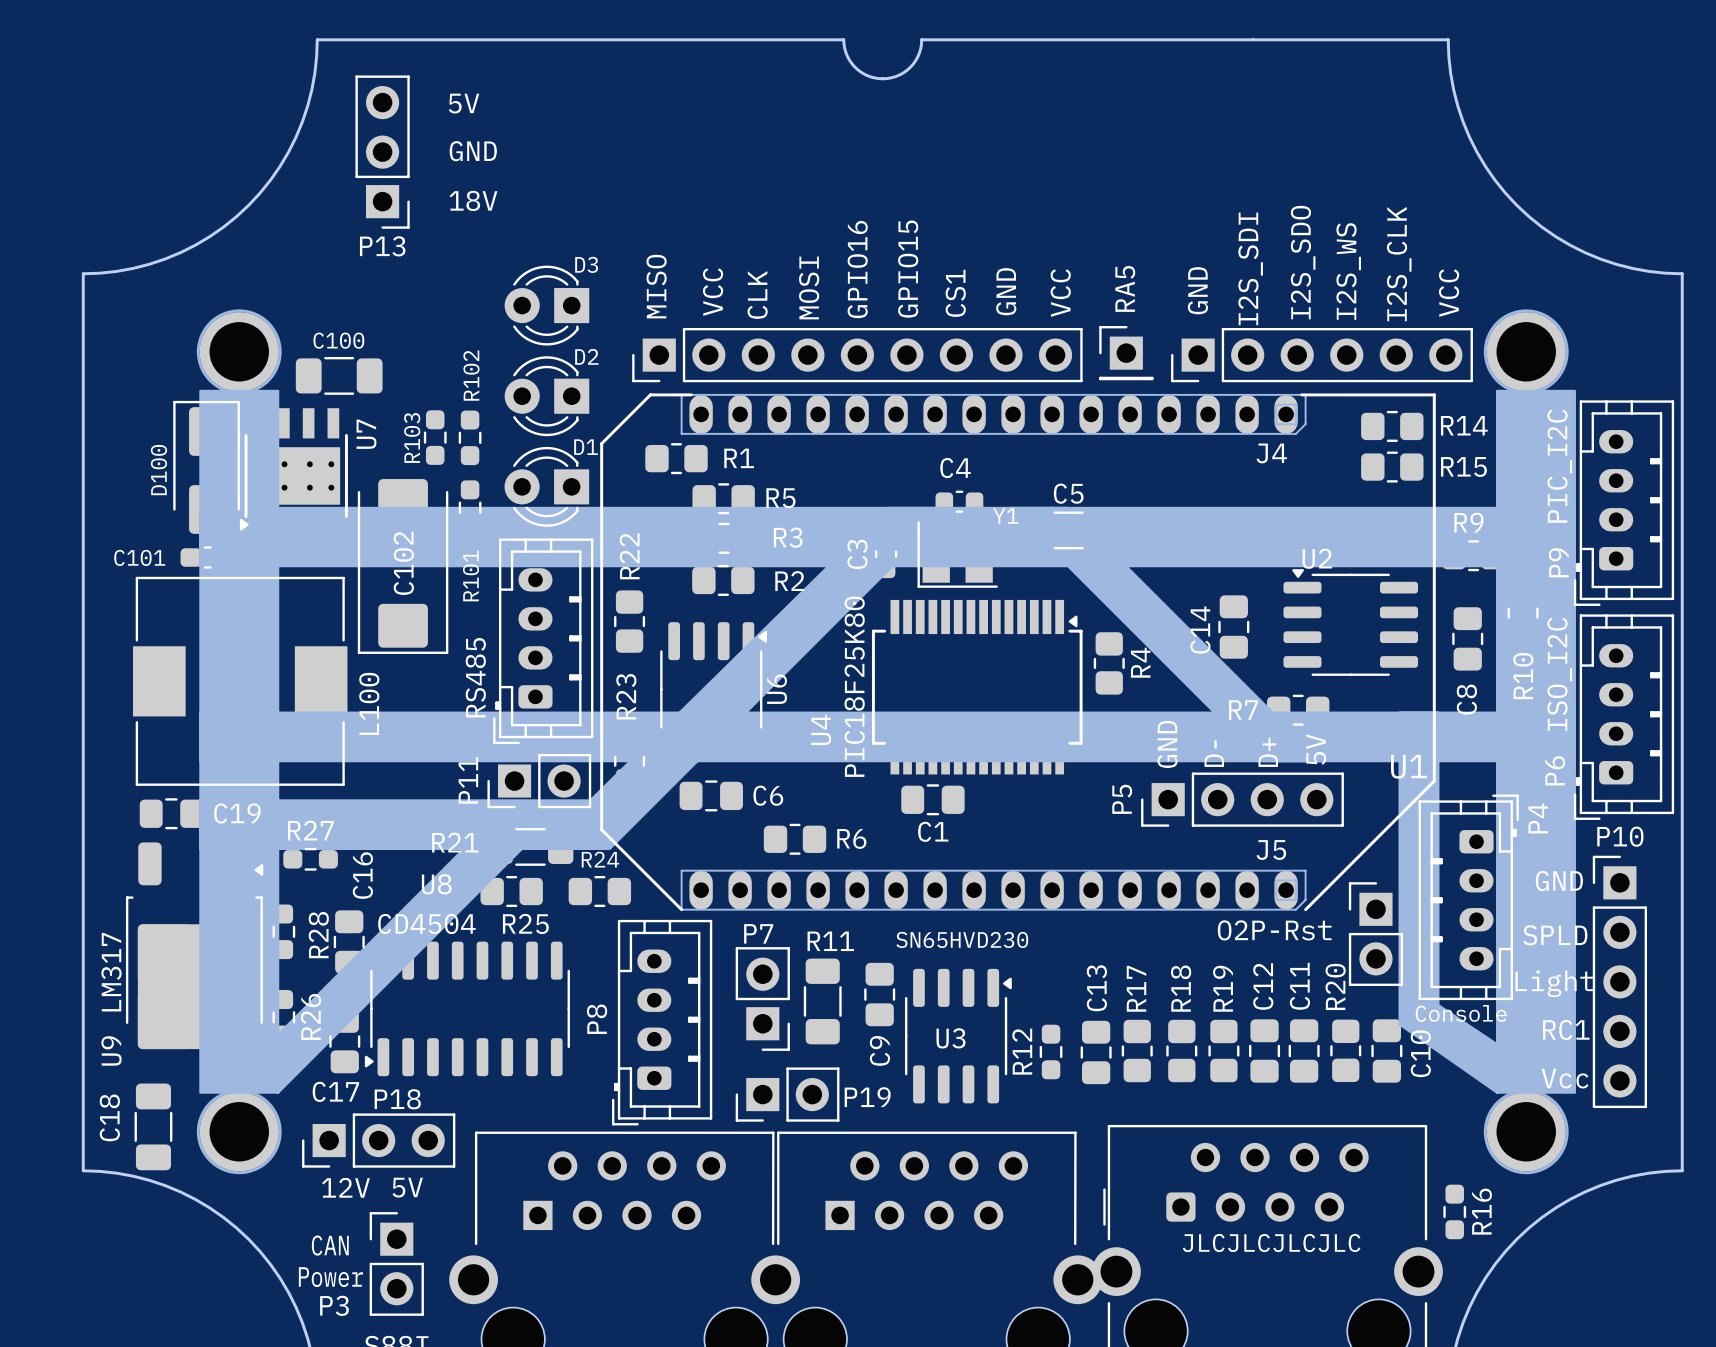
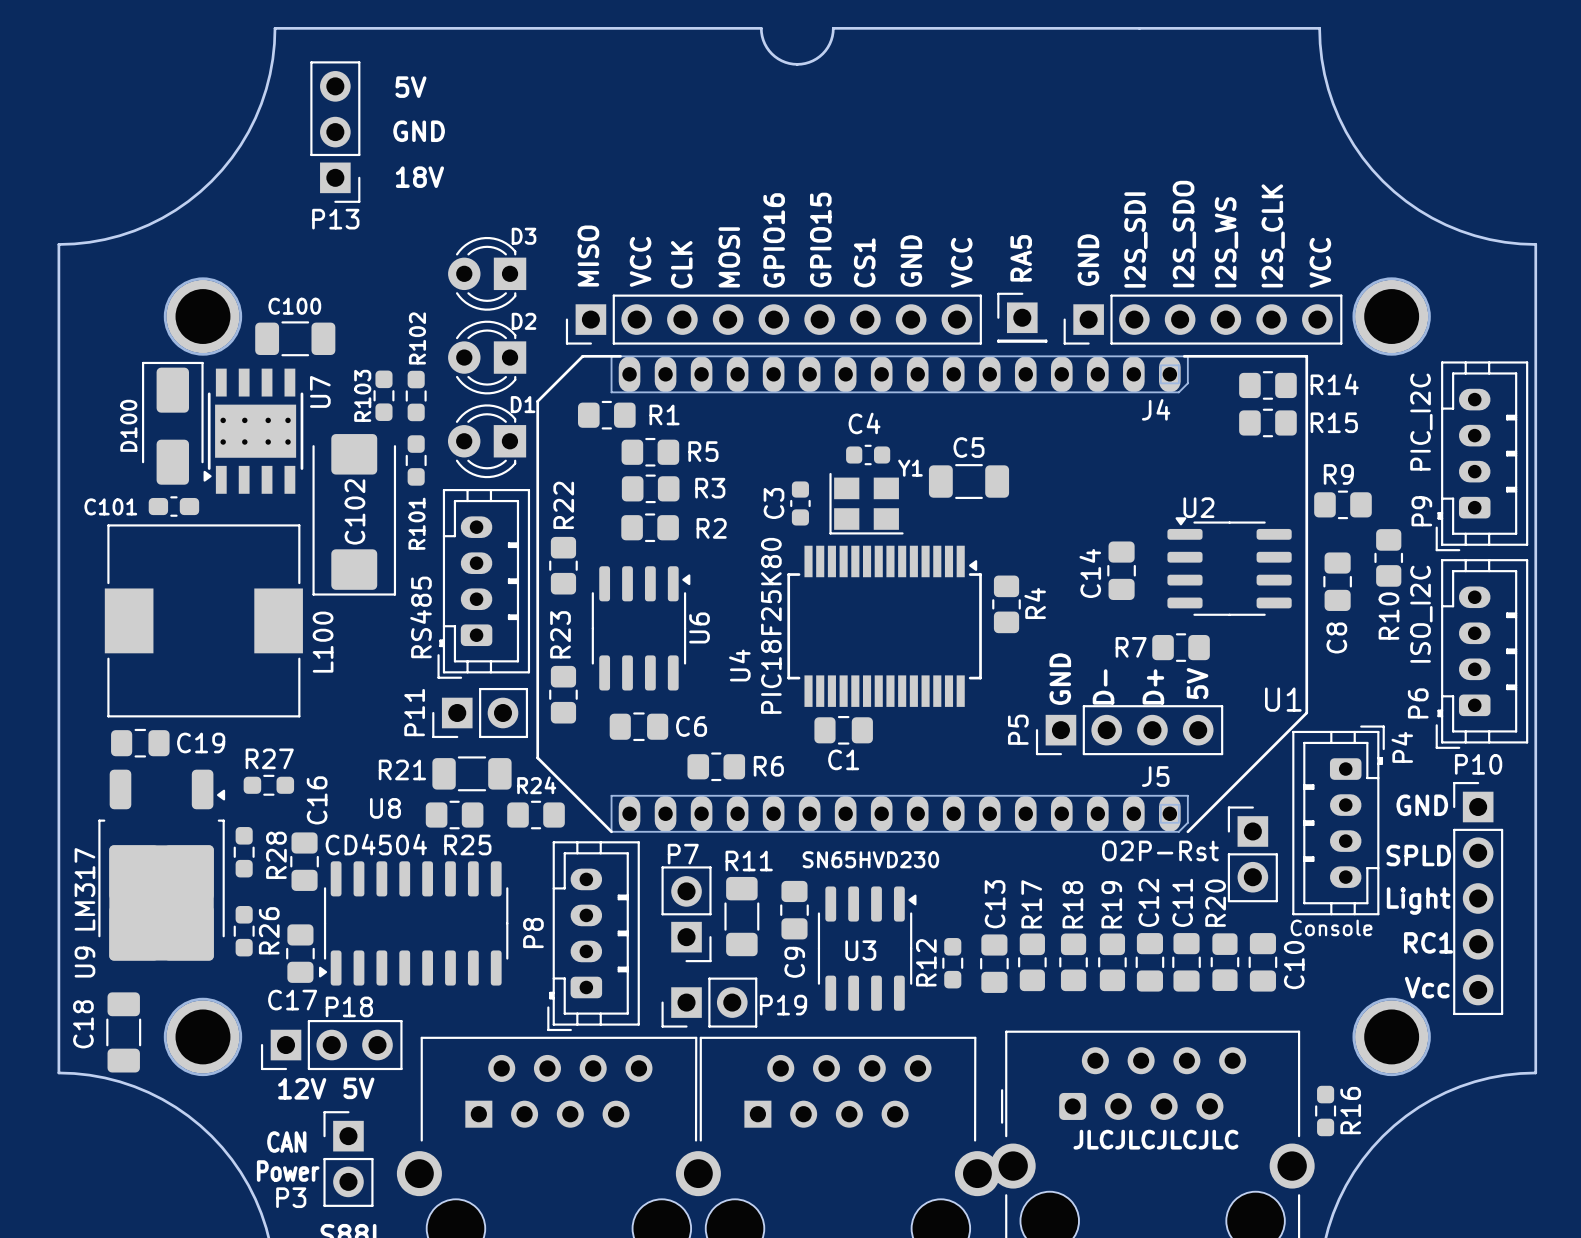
drawing: [199, 389, 1576, 1094] -> none

